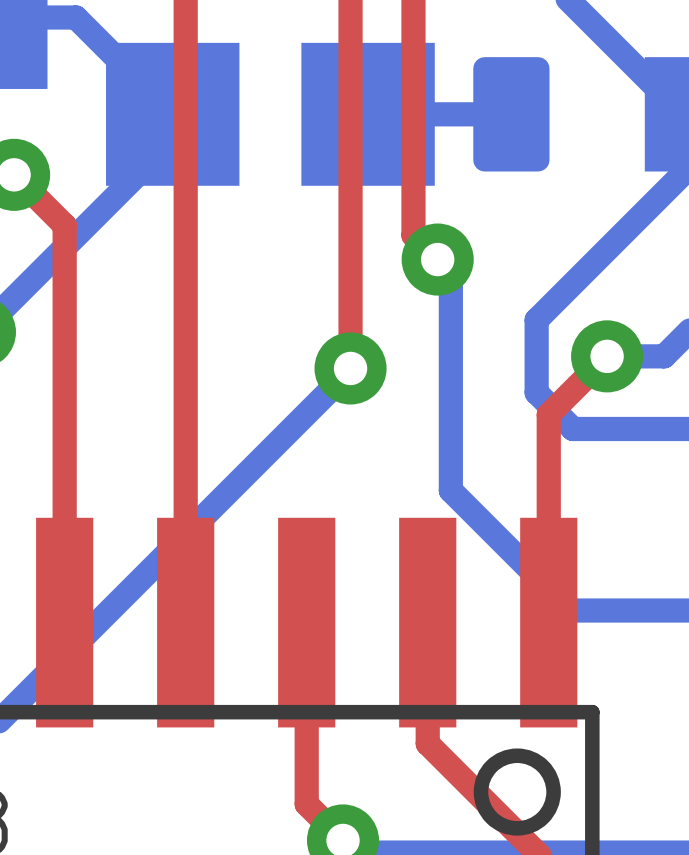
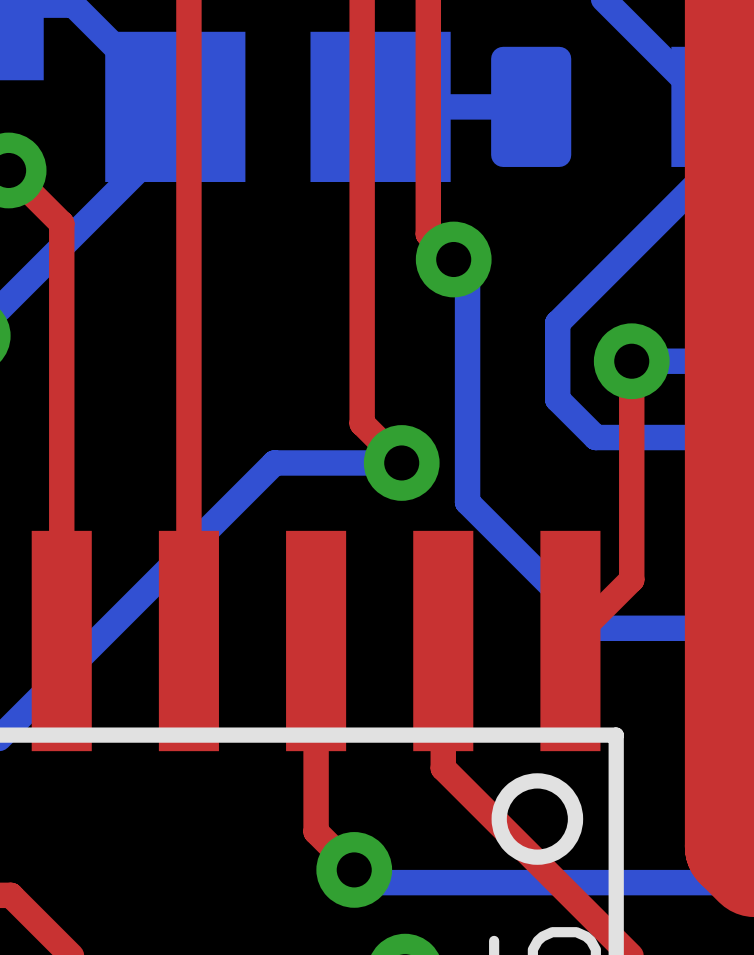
top track: (607, 356) (548, 414) (548, 622) -> (631, 361) (631, 579) (570, 641)
top track: none -> (362, 373) (362, 423) (401, 462)
via position: (350, 368) -> (401, 462)
bottom track: (350, 369) (267, 453) -> (401, 462) (274, 462)

